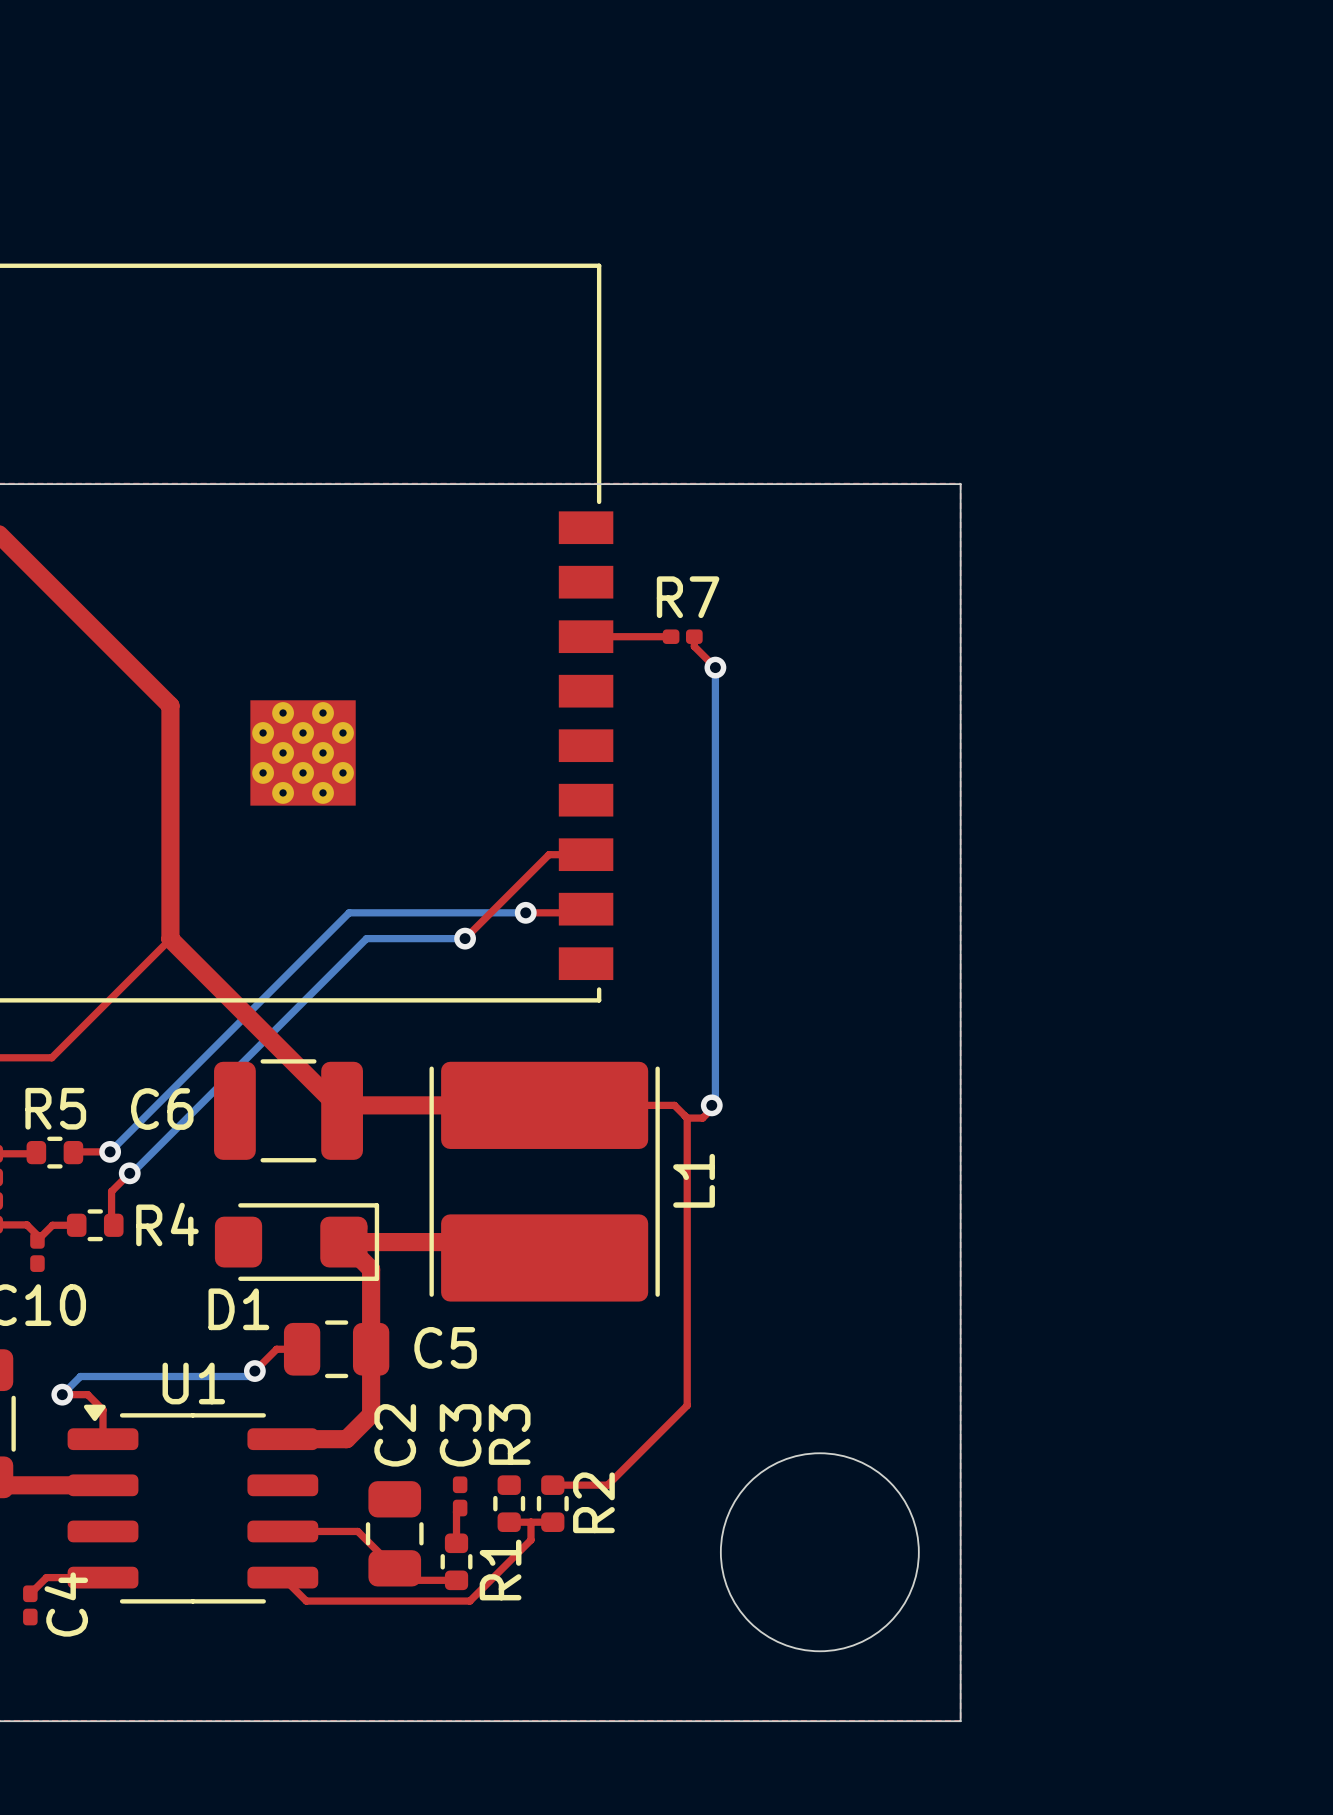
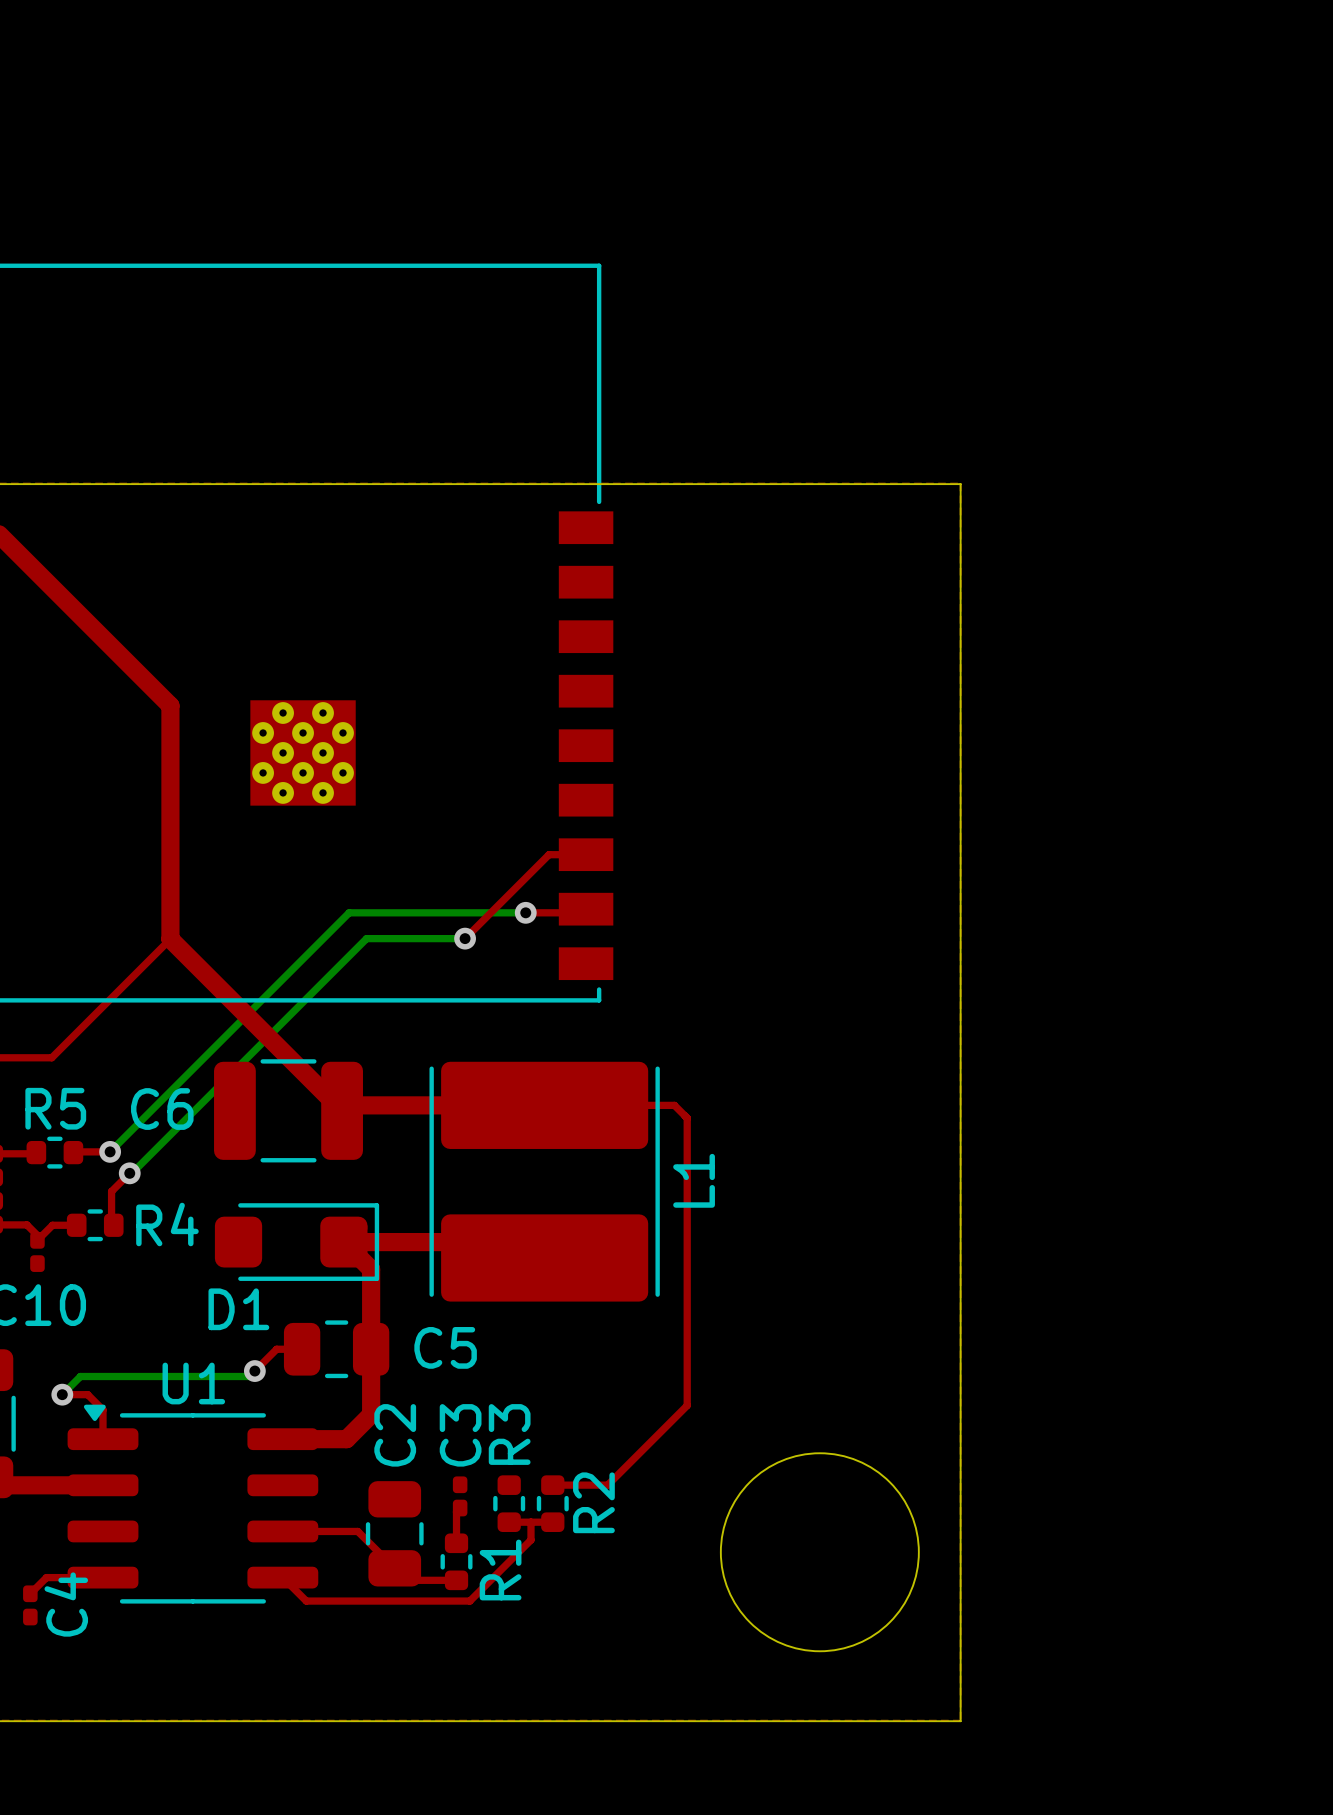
top track: (586, 636) (671, 636) -> none
R7: (682, 636) -> none
top track: (694, 636) (694, 646) (715, 667) -> none
bottom track: (715, 667) (715, 1101) (711, 1105) -> none
via: (715, 667) -> none
top track: (711, 1105) (711, 1109) (702, 1118) (687, 1118) -> none
via: (711, 1105) -> none

